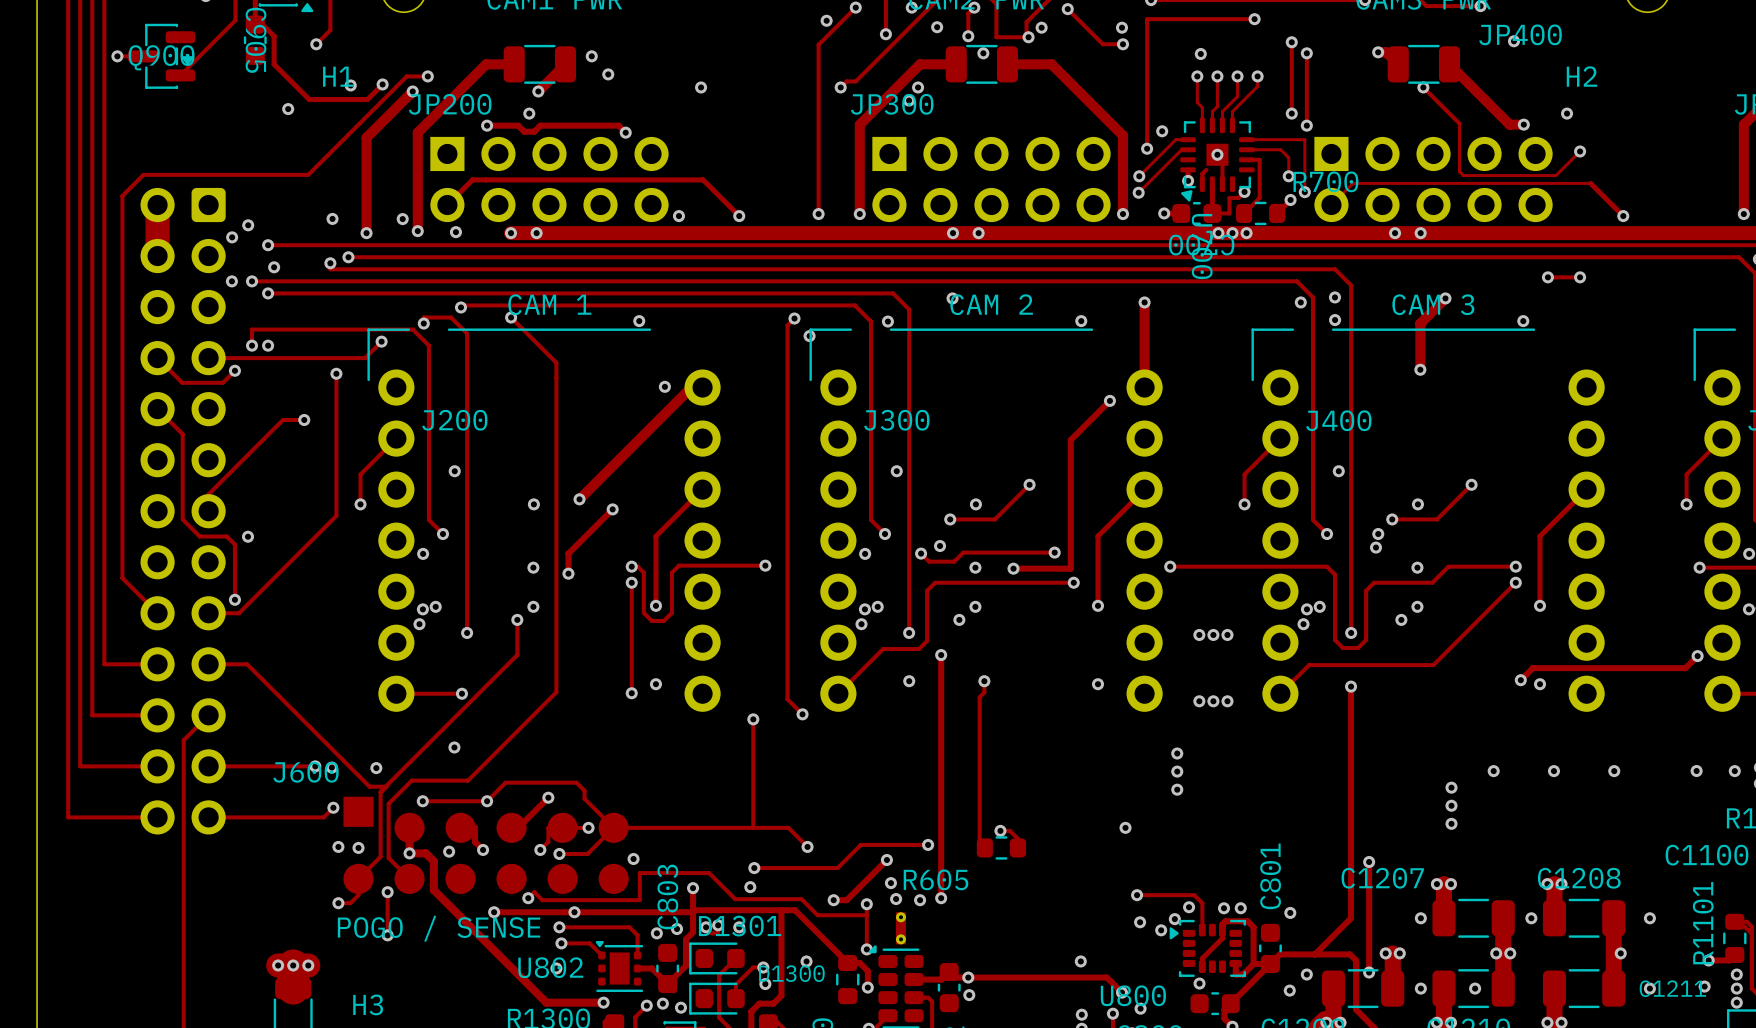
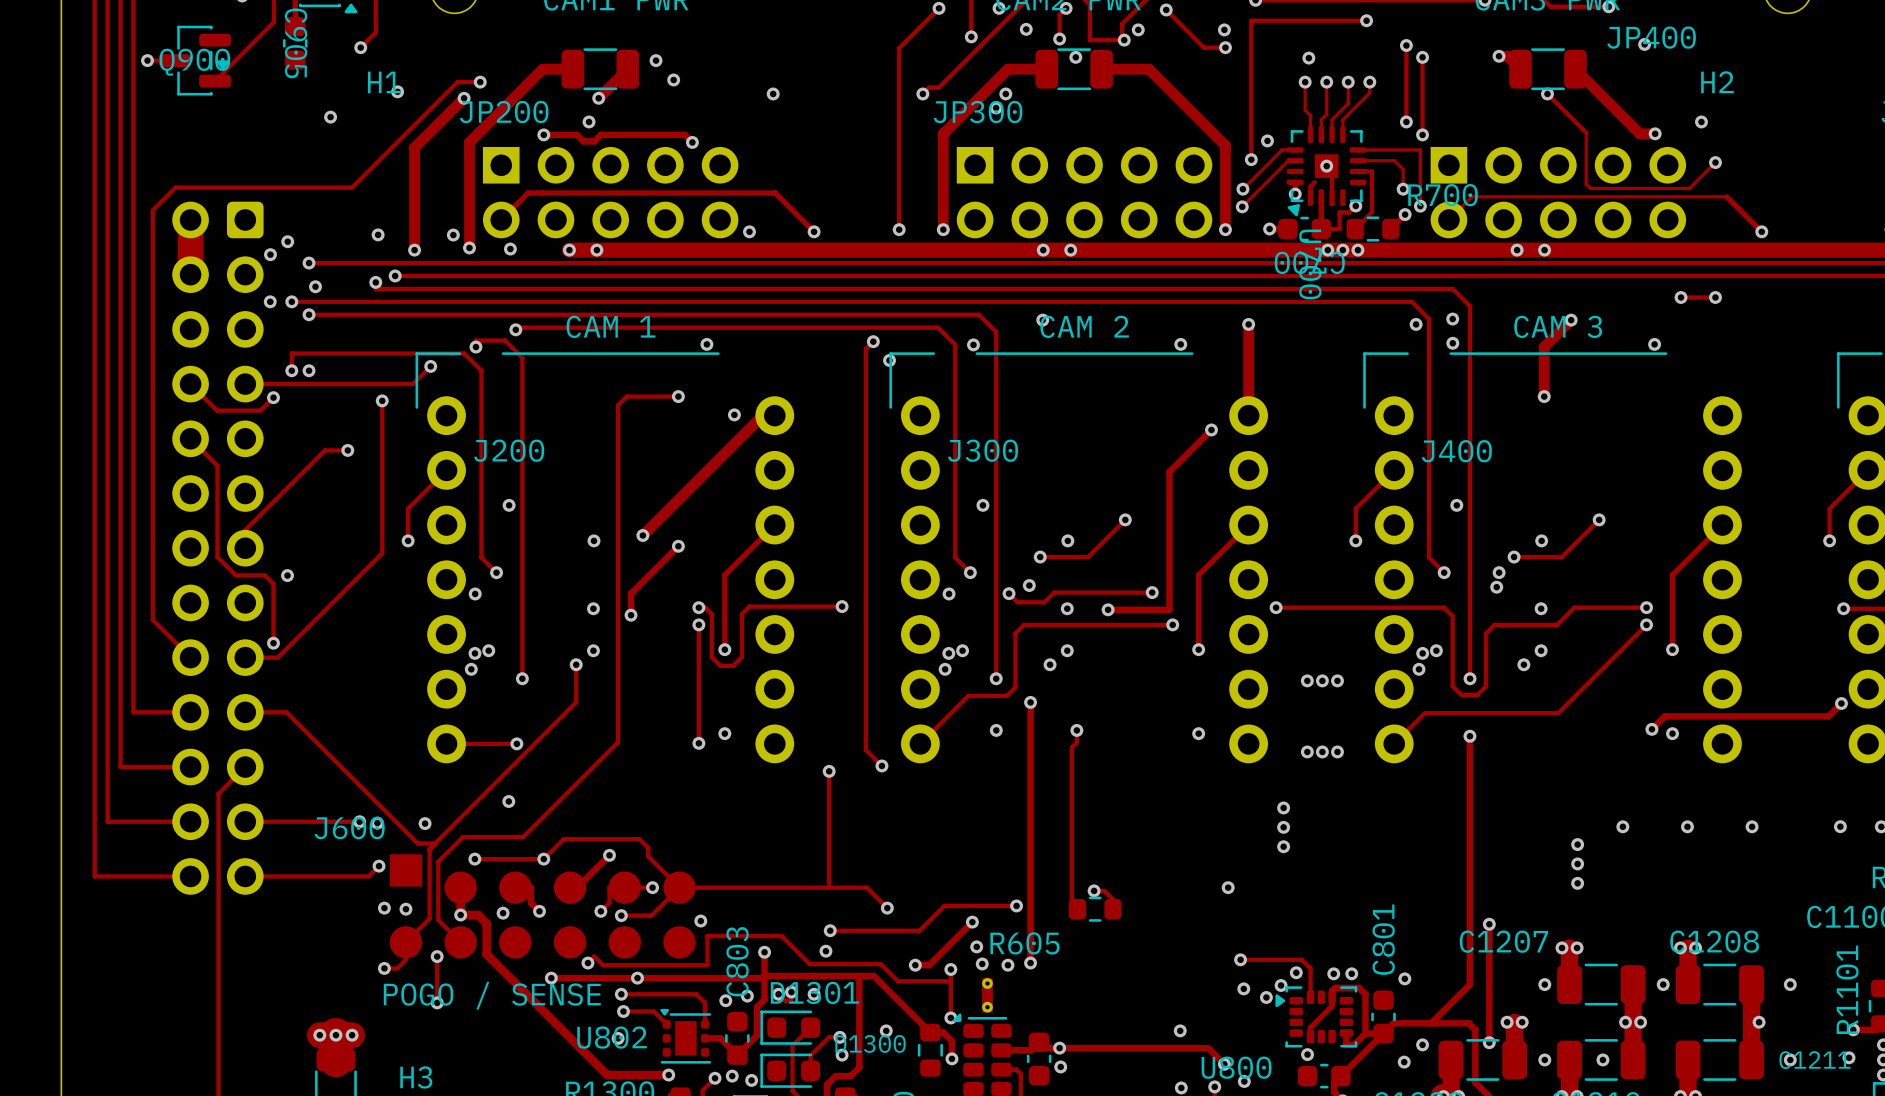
via: (826, 20) -> none
track: (255, 24) (262, 24) (274, 36) (274, 64) (309, 99) (367, 99) (382, 84) -> none
via: (382, 84) -> none
track: (511, 317) (556, 362) (556, 377) -> (678, 396) (626, 396) (618, 405)
via position: (511, 317) -> (678, 396)

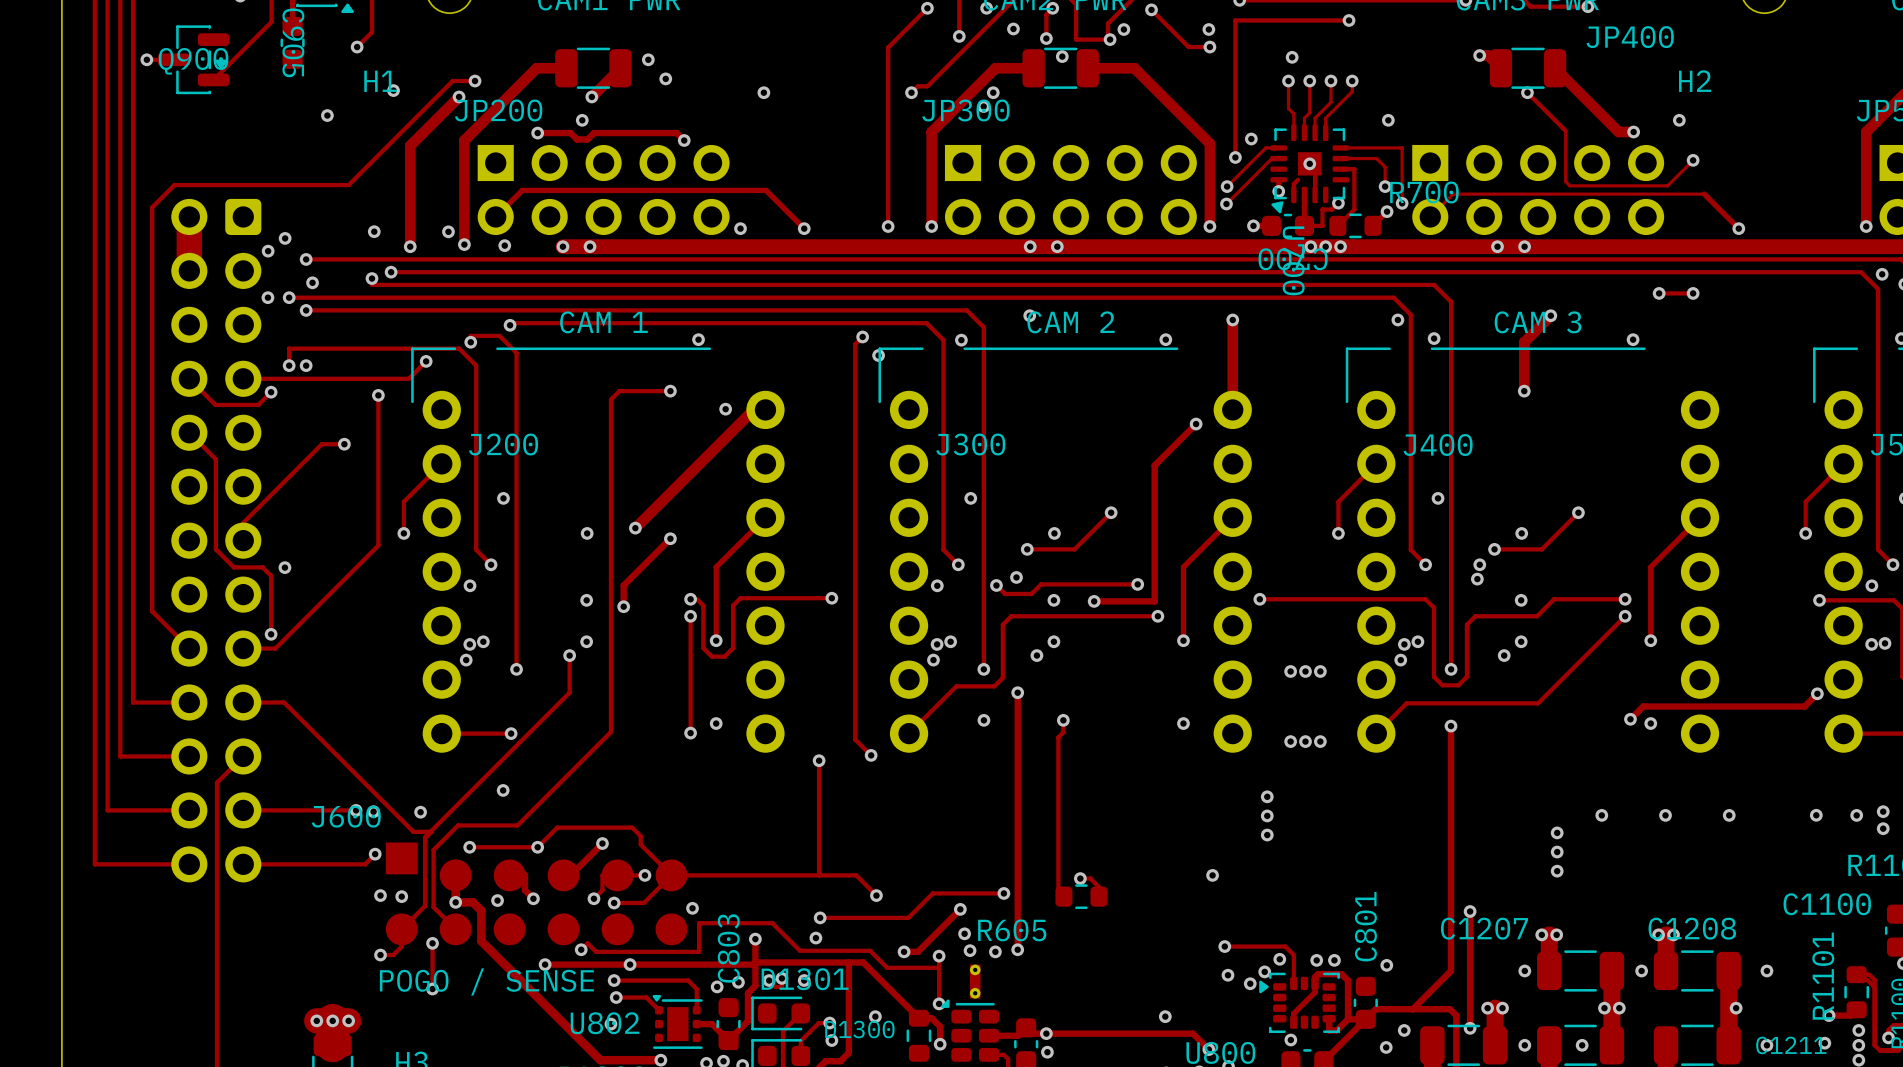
via: (1644, 44) -> none
track: (1406, 45) (1406, 121) -> none
via: (1406, 45) -> none
track: (1422, 57) (1422, 134) -> none
via: (1422, 57) -> none
via: (1422, 134) -> none
via: (1452, 319) -> none

